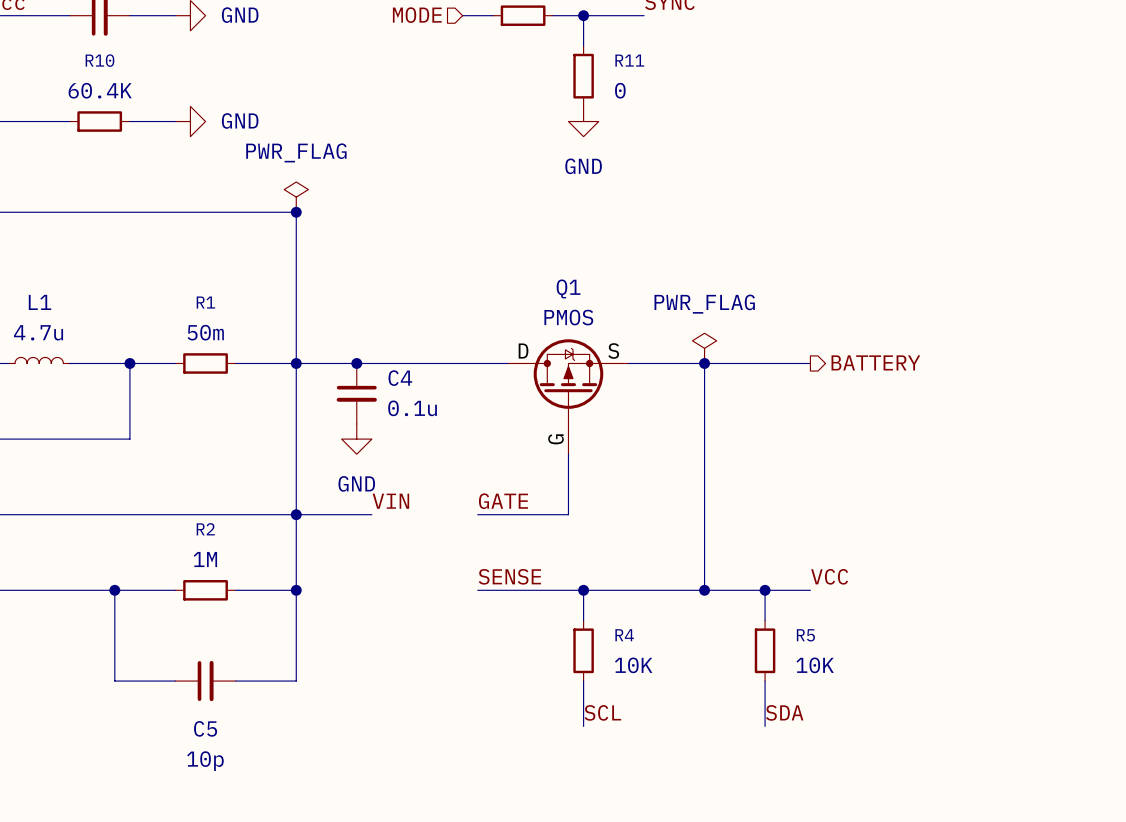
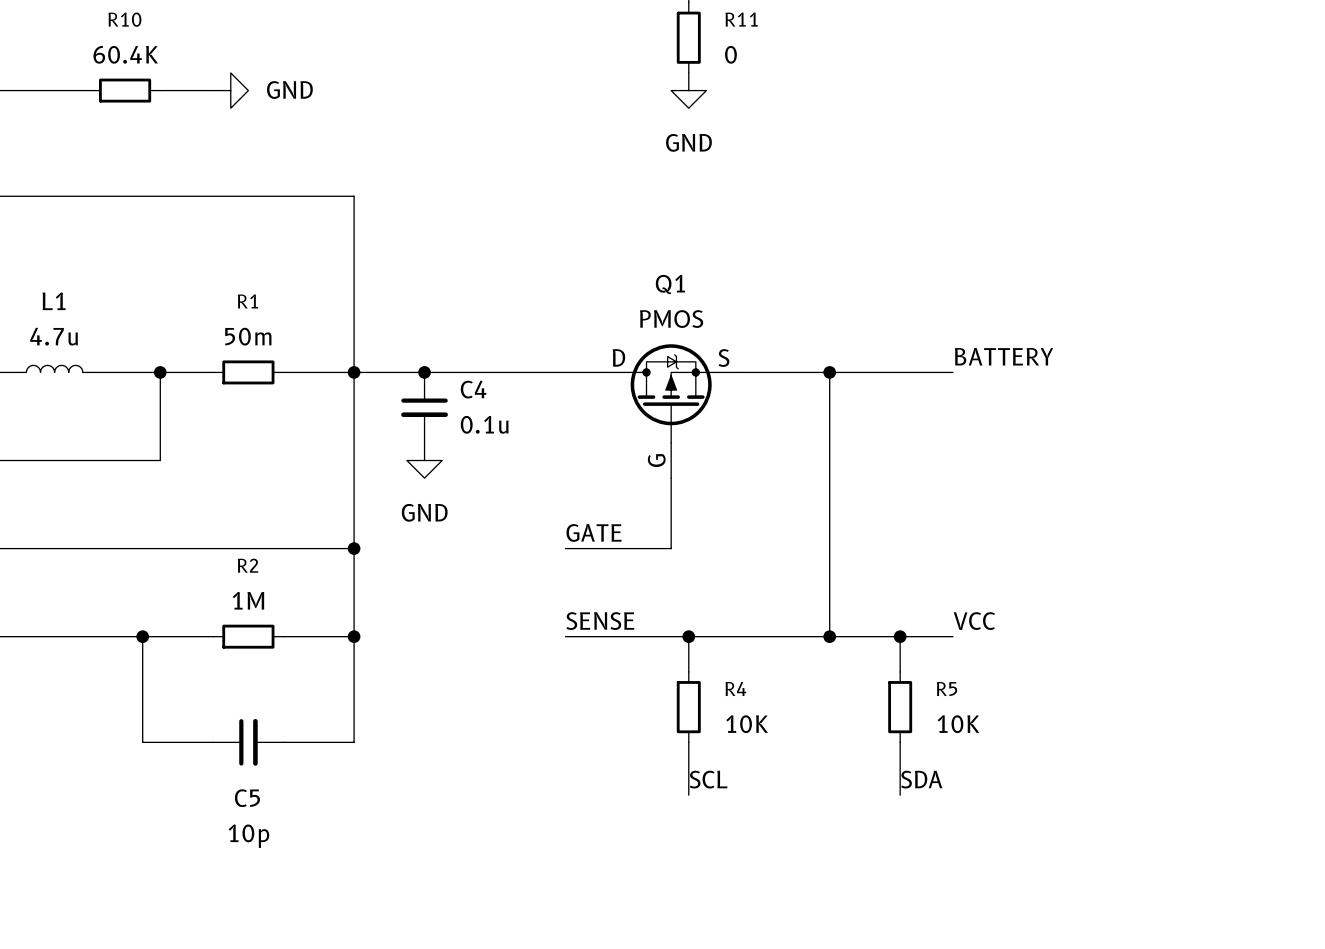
power symbol: PWR_FLAG (296, 197) -> none
junction: (296, 212) -> none
power symbol: PWR_FLAG (704, 348) -> none
label: none -> BATTERY (1004, 356)
hierarchical label: BATTERY (875, 362) -> none
label: VIN (390, 501) -> none
wire: (296, 514) (371, 514) -> none

